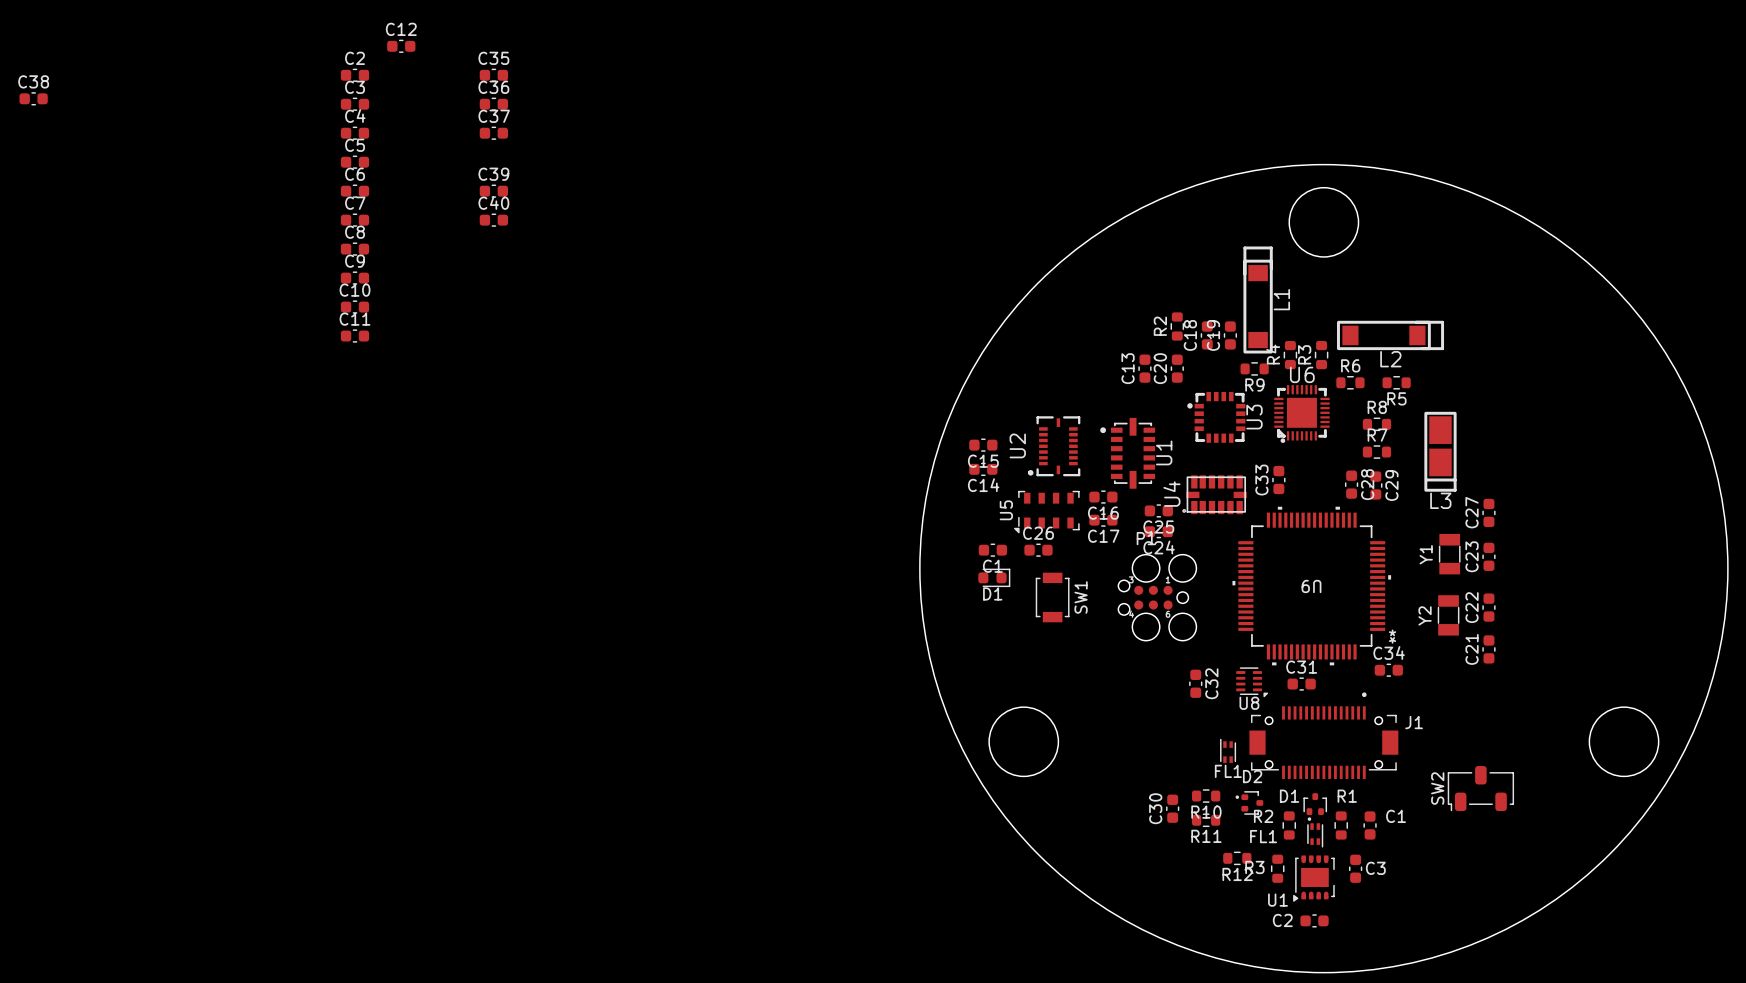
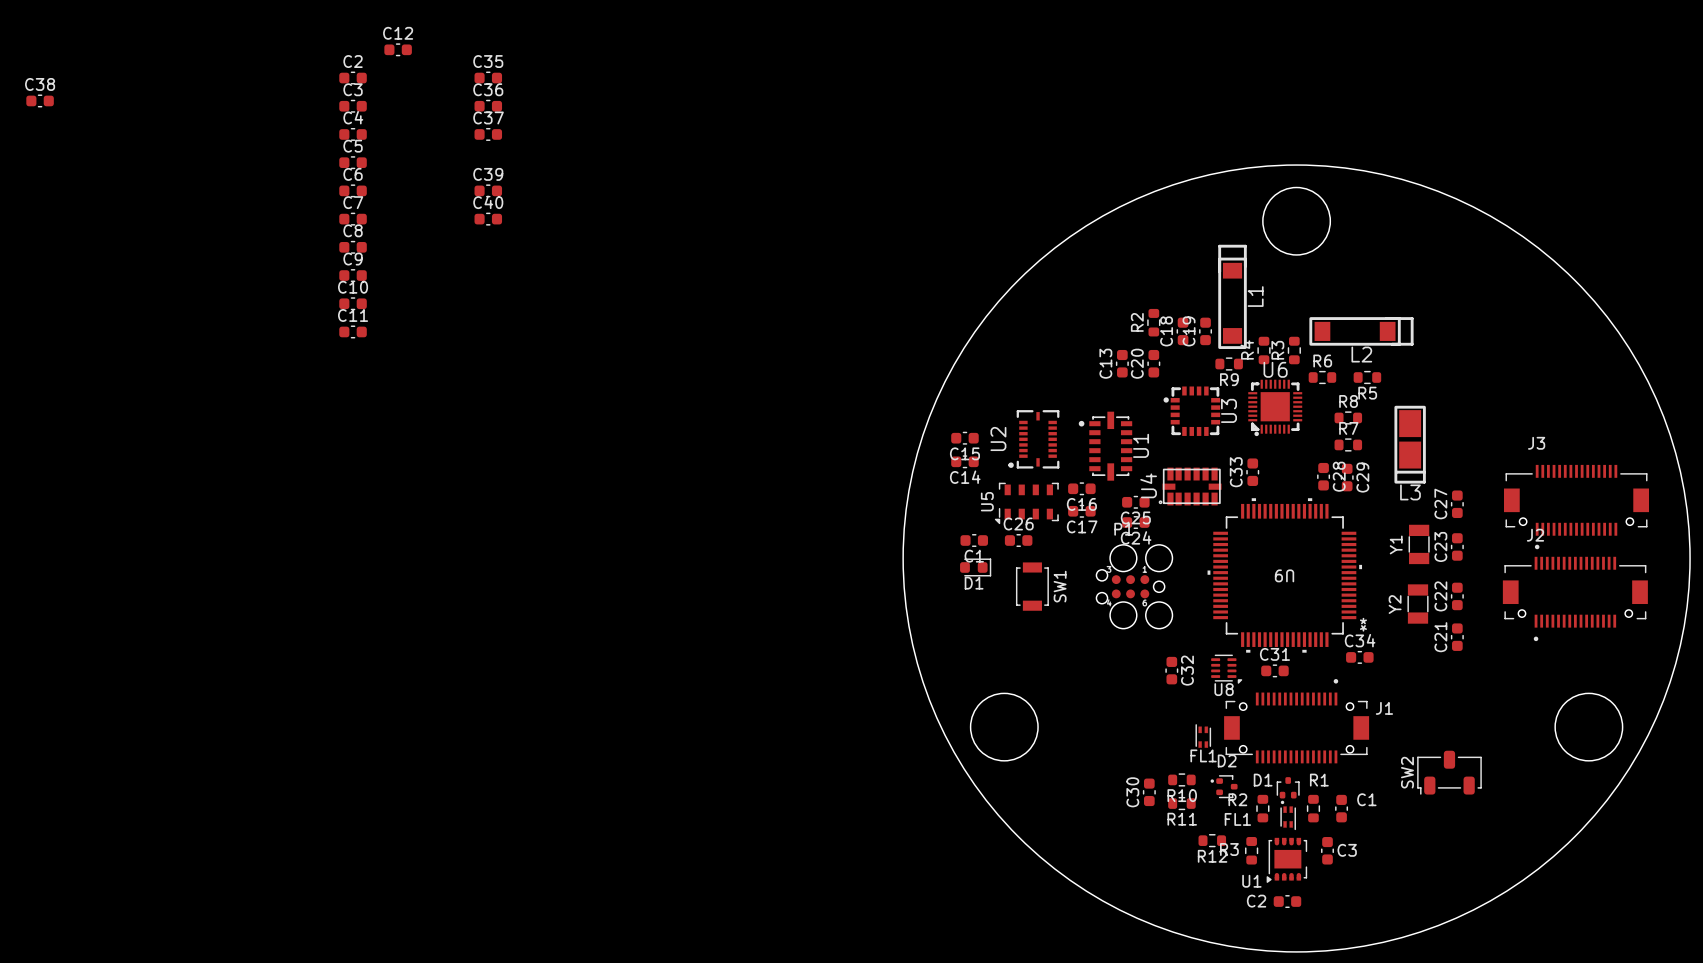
J3: none -> (1576, 507)
J2: none -> (1575, 598)

